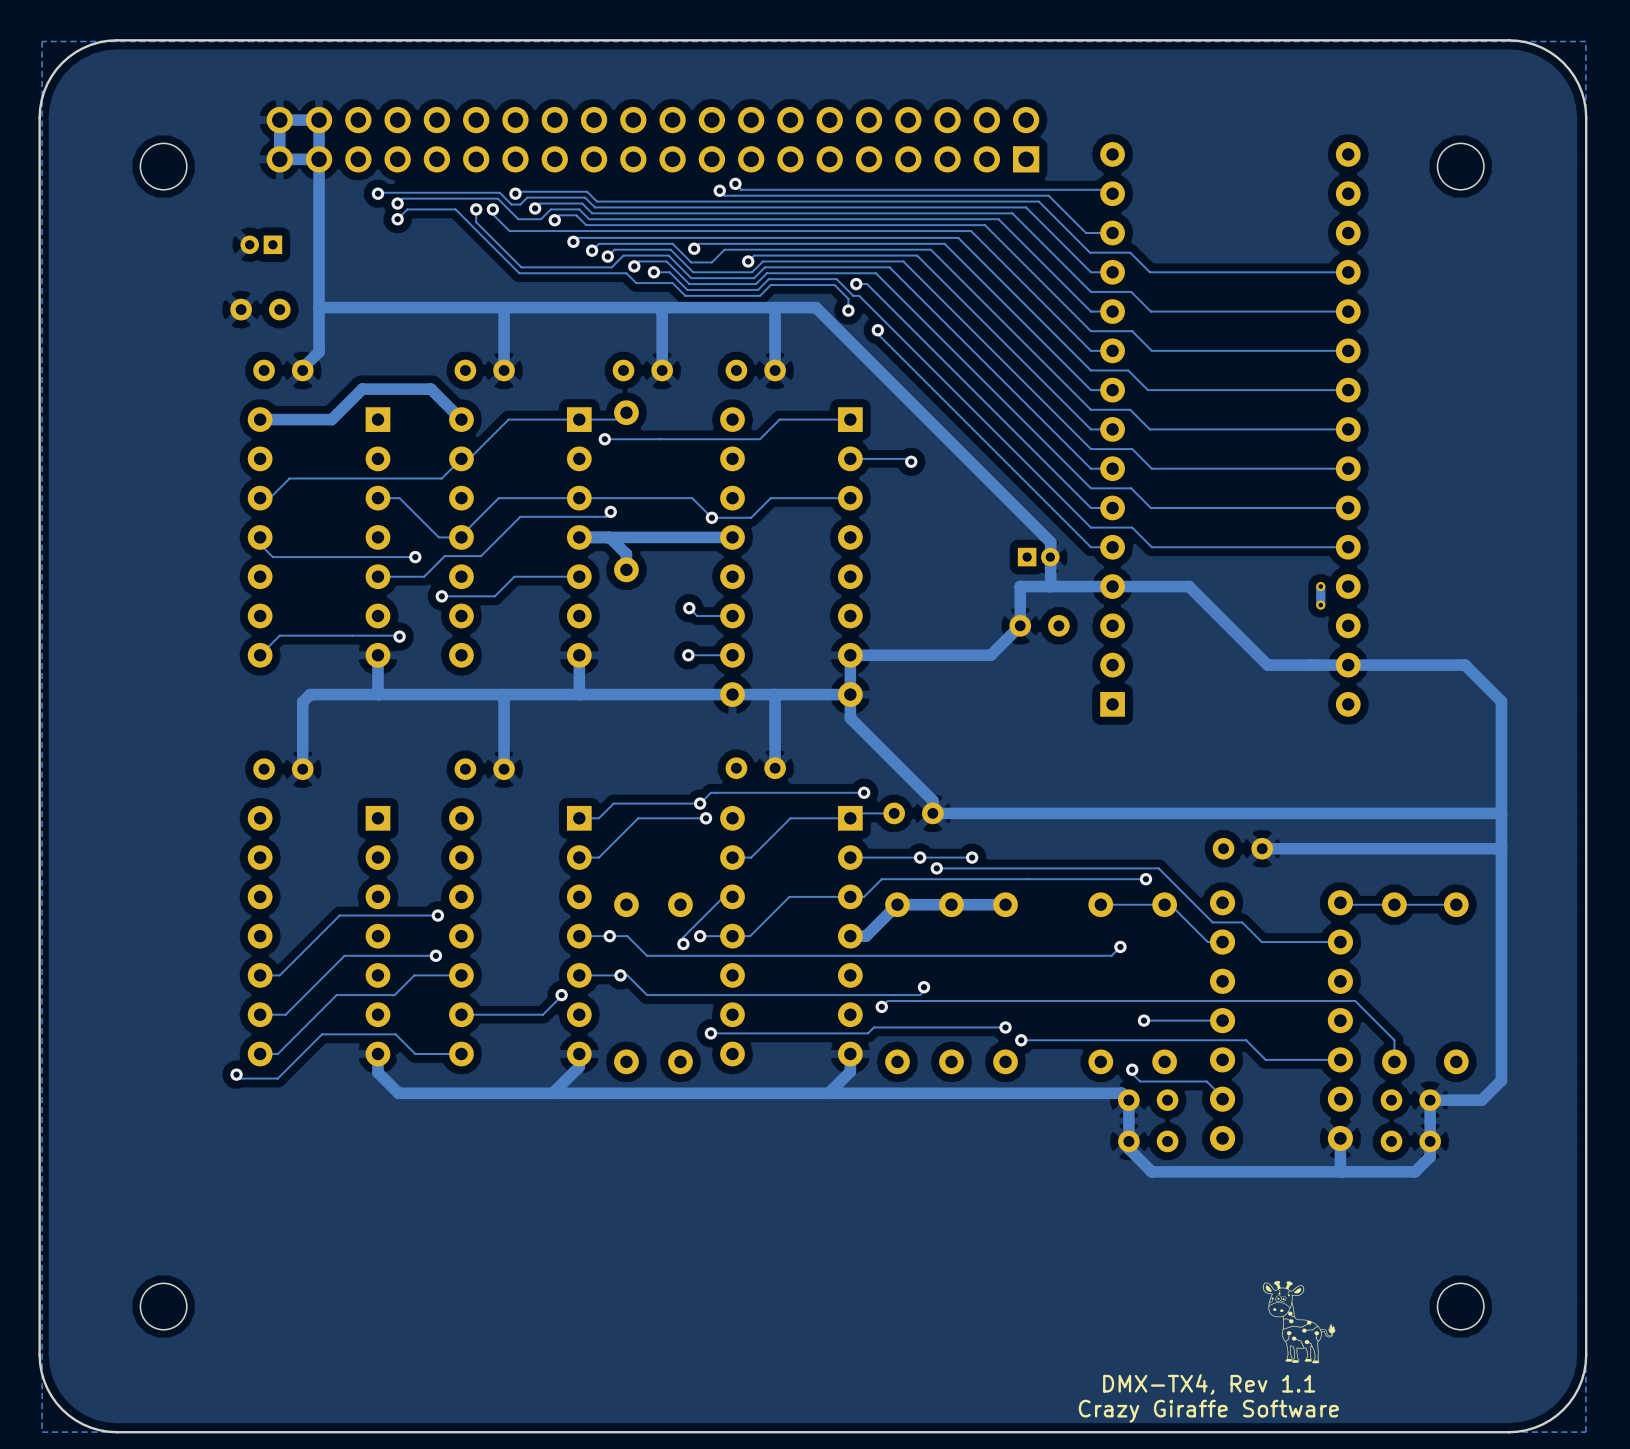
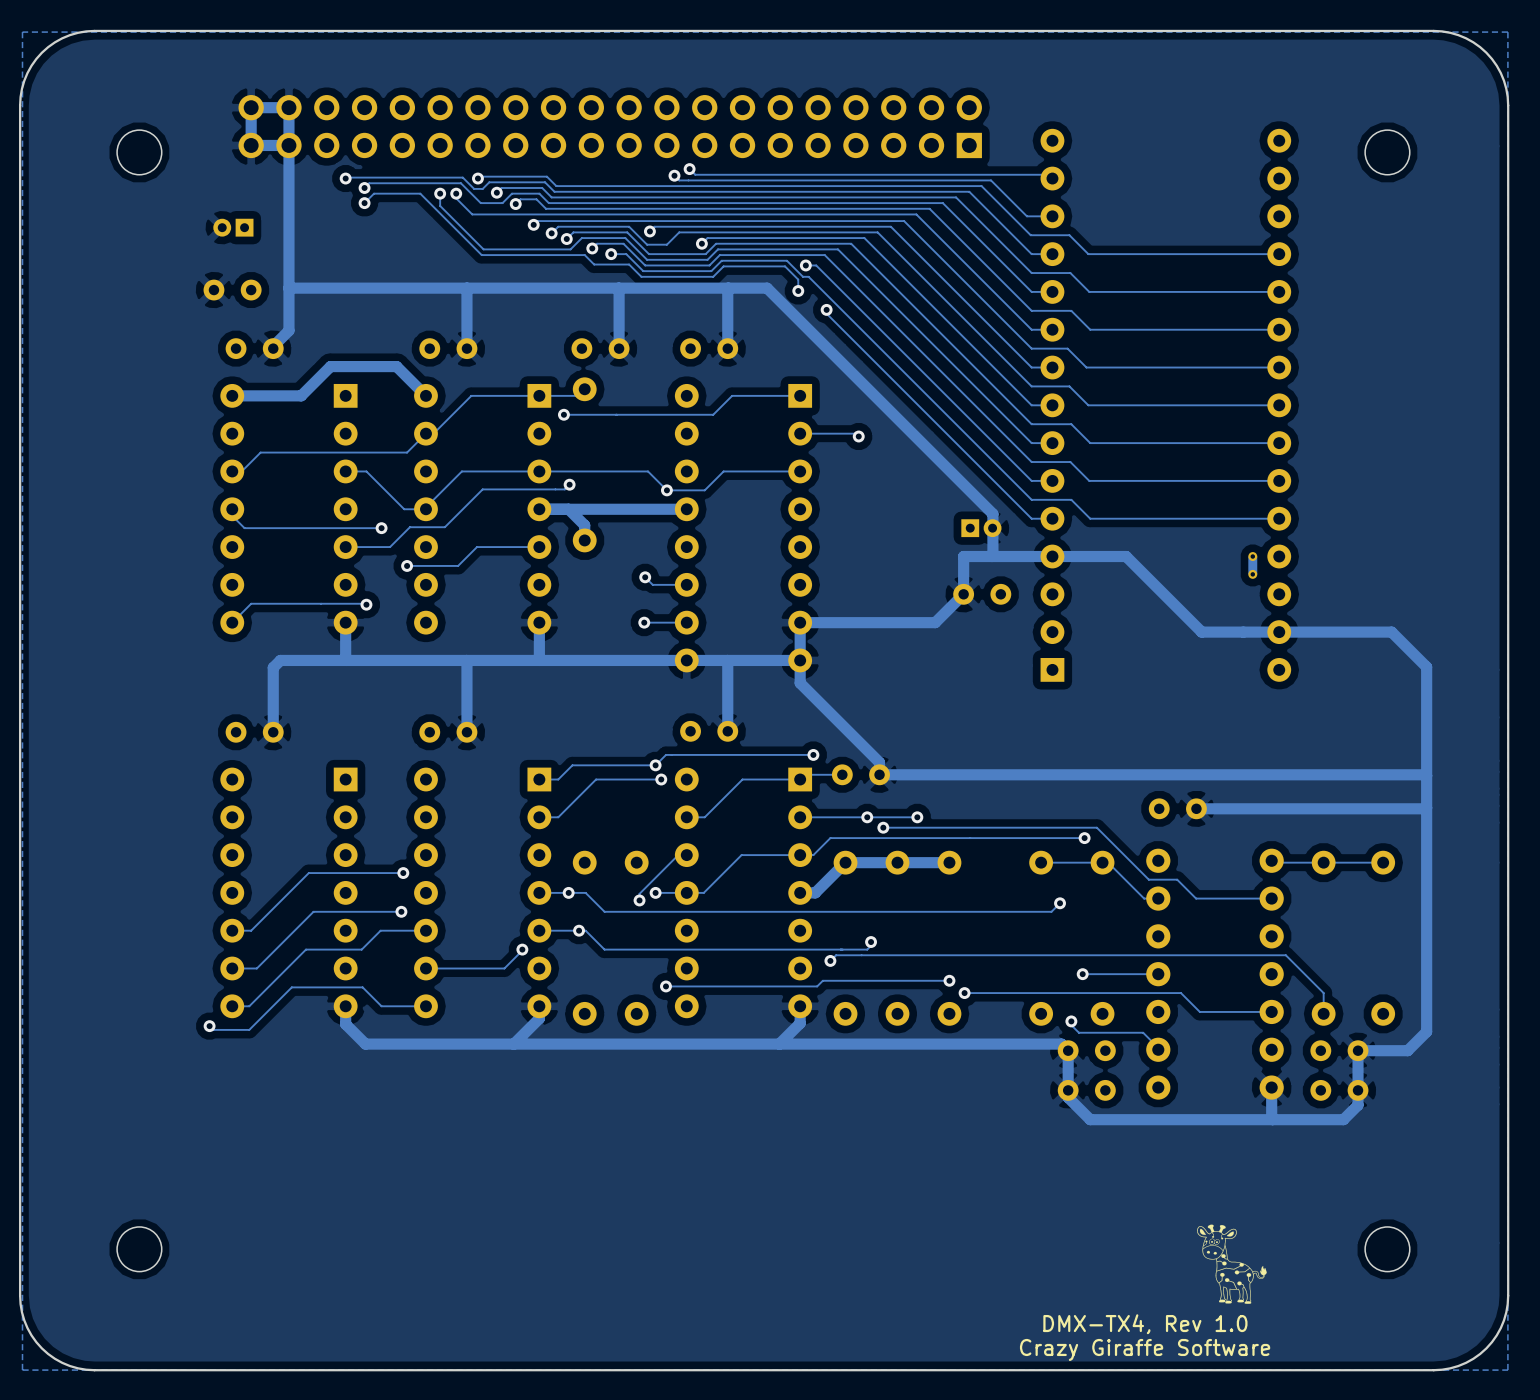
text: DMX-TX4, Rev 1.1 (1209, 1384) -> DMX-TX4, Rev 1.0 (1145, 1324)

